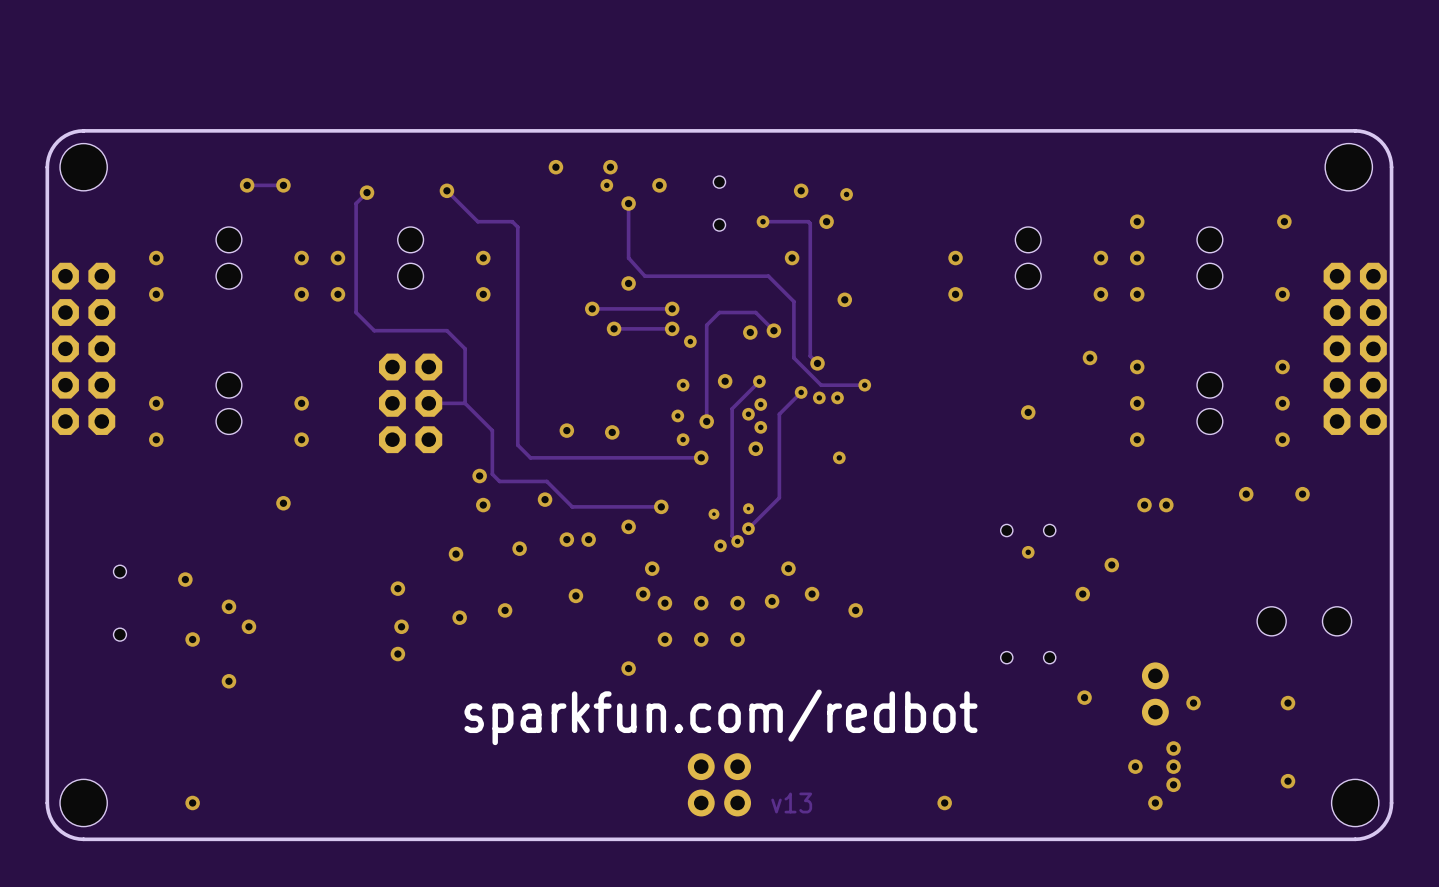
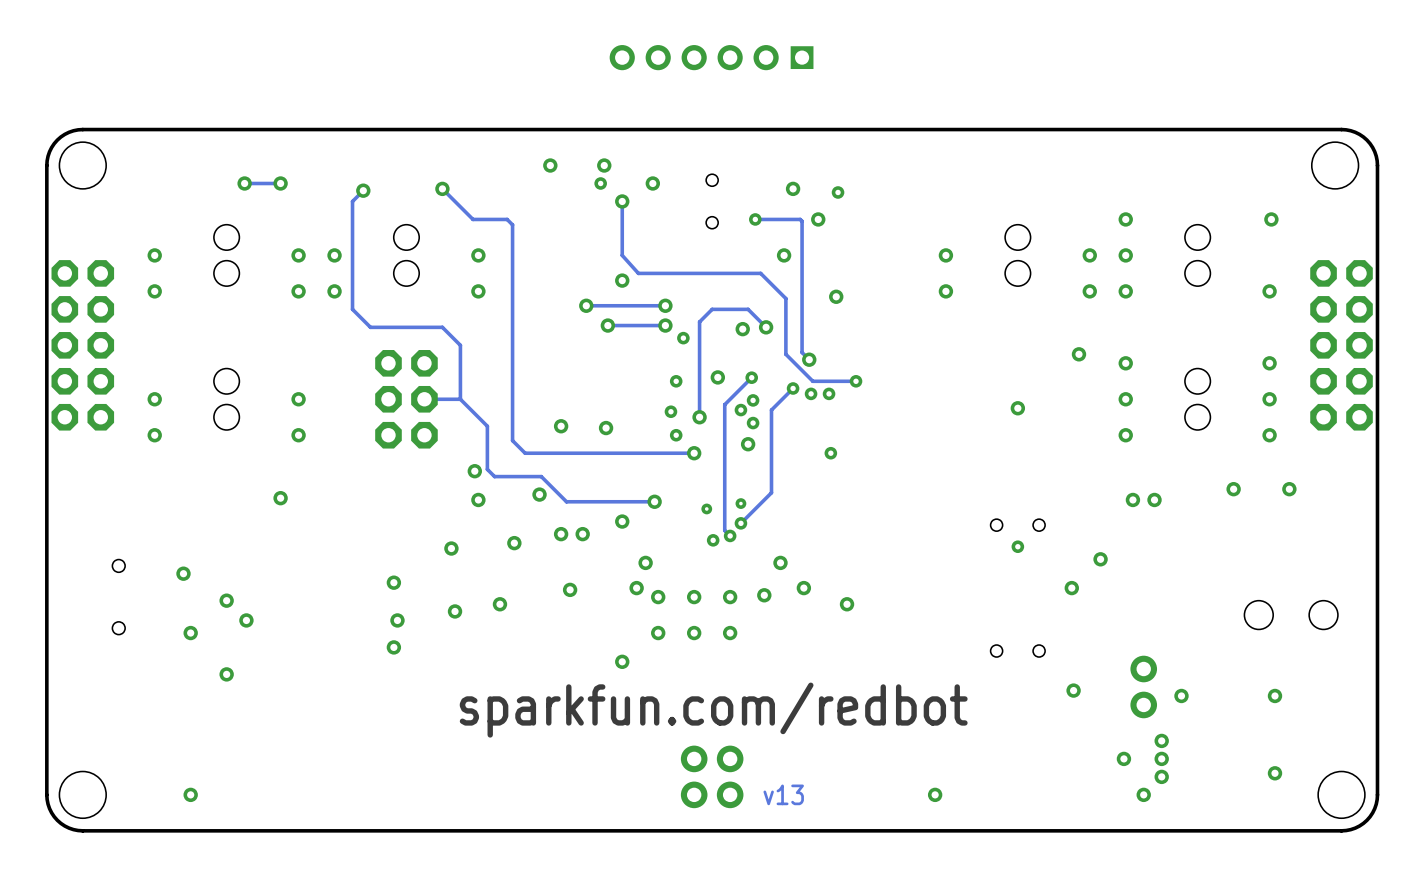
part: none -> (711, 57)

